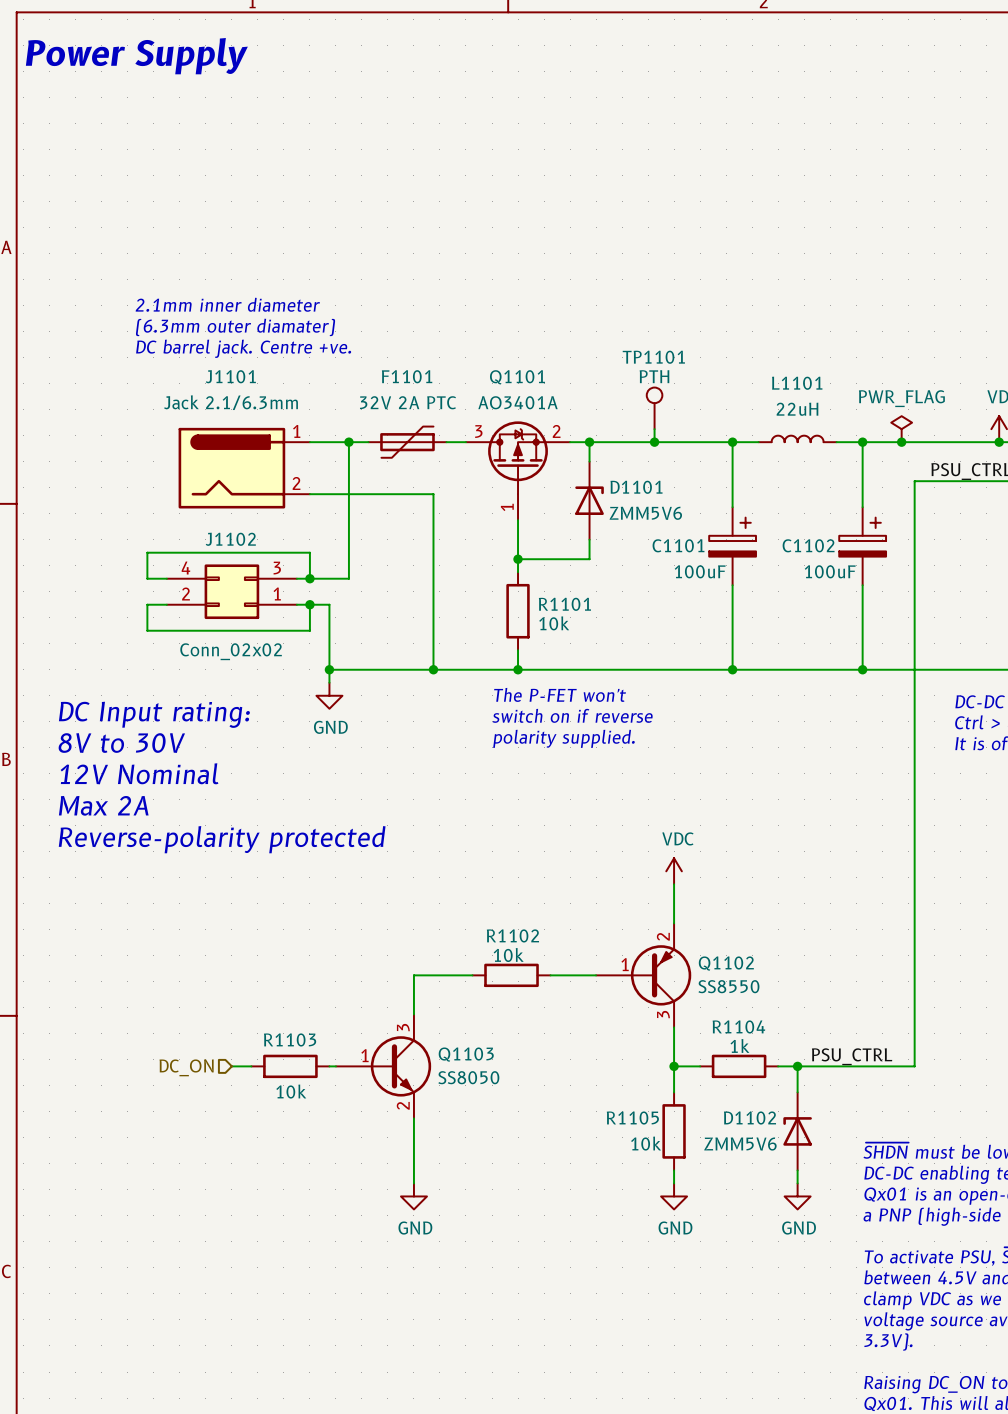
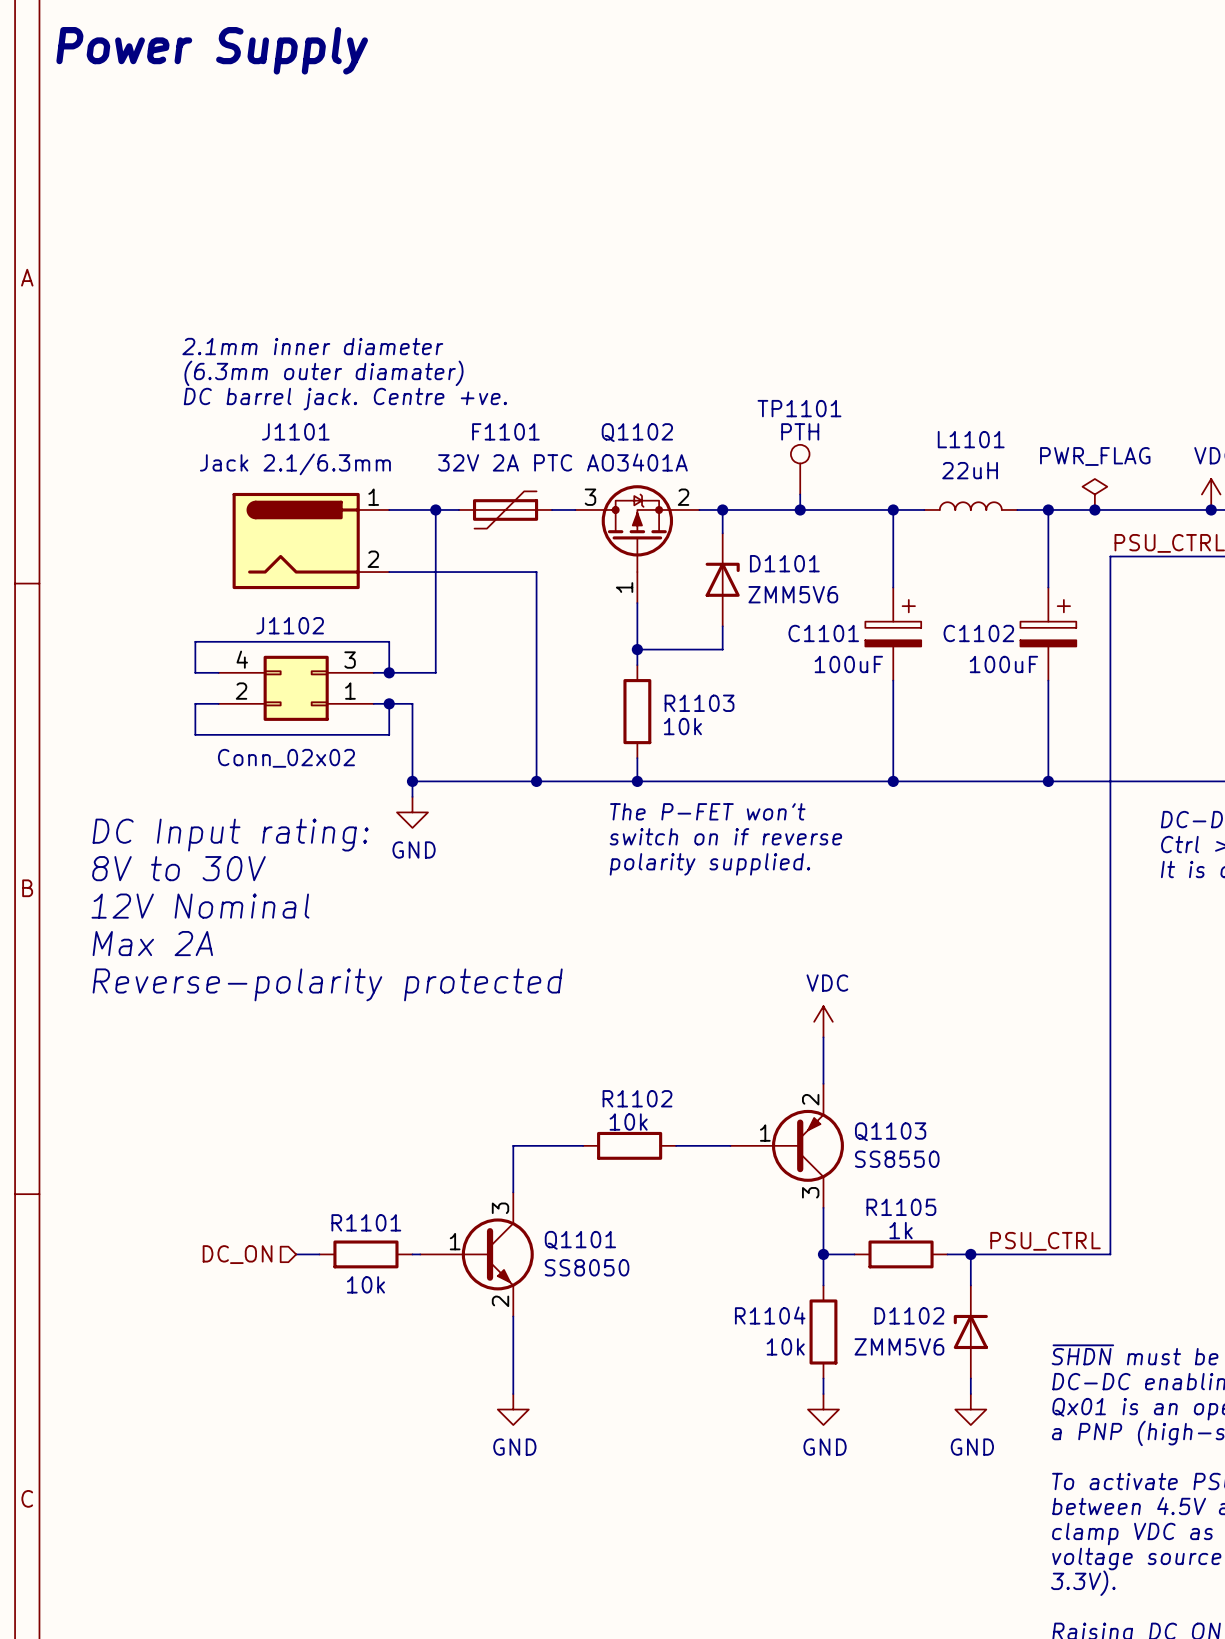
Q1101 name: Q1101 (517, 377) -> Q1102 (637, 432)
R1101 name: R1101 (564, 604) -> R1103 (699, 703)
Q1102 name: Q1102 (726, 963) -> Q1103 (890, 1131)
R1104 name: R1104 (738, 1026) -> R1105 (901, 1207)
R1103 name: R1103 (290, 1039) -> R1101 (366, 1222)
Q1103 name: Q1103 (466, 1054) -> Q1101 (580, 1240)
R1105 name: R1105 (632, 1118) -> R1104 (770, 1315)

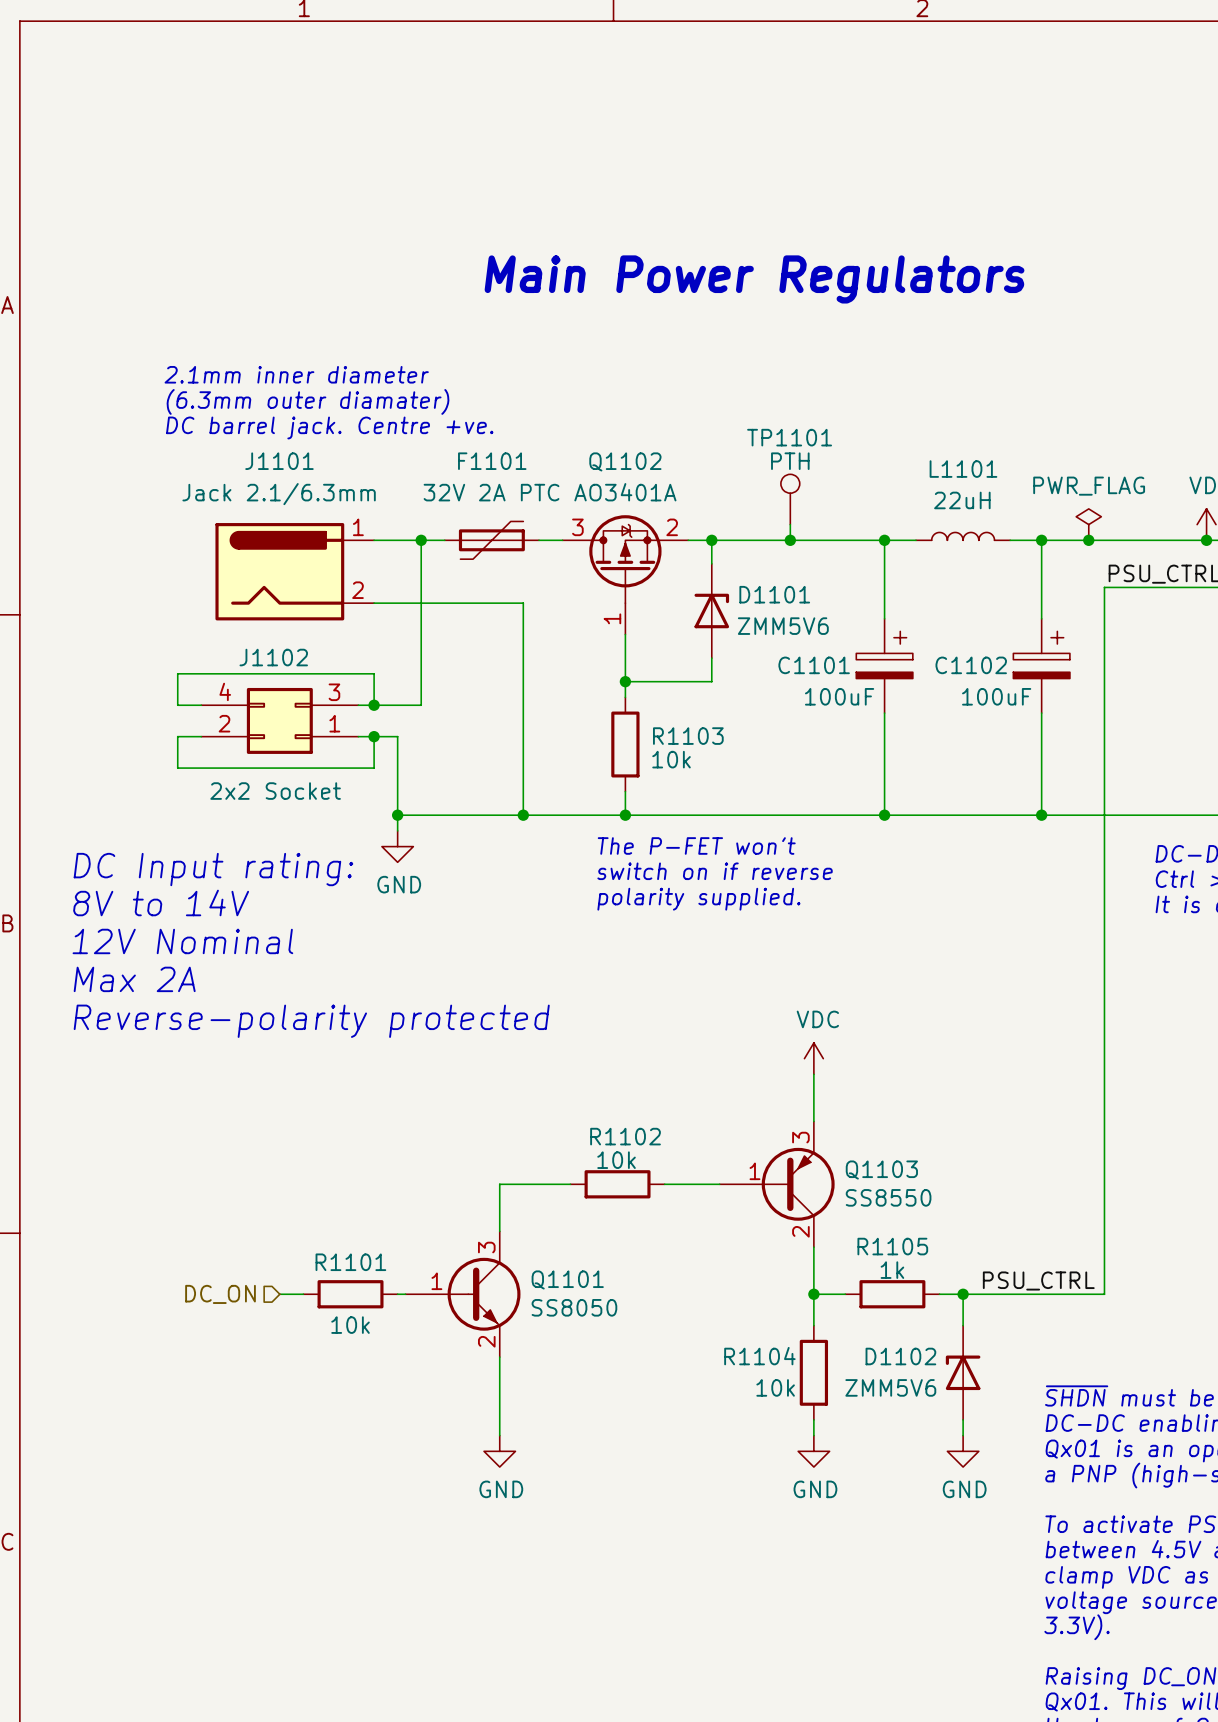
text: Power Supply (212, 50) -> none
text: none -> Main Power Regulators (754, 279)
J1102 value: Conn_02x02 (286, 758) -> 2x2 Socket (275, 791)
text: 8V to 30V (178, 868) -> 8V to 14V (161, 902)
Q1103 pin number: 2 (810, 1099) -> 3 (800, 1137)
Q1101 symbol: [420, 1192, 534, 1317] -> [405, 1231, 521, 1358]
Q1103 pin number: 3 (810, 1192) -> 2 (800, 1231)

